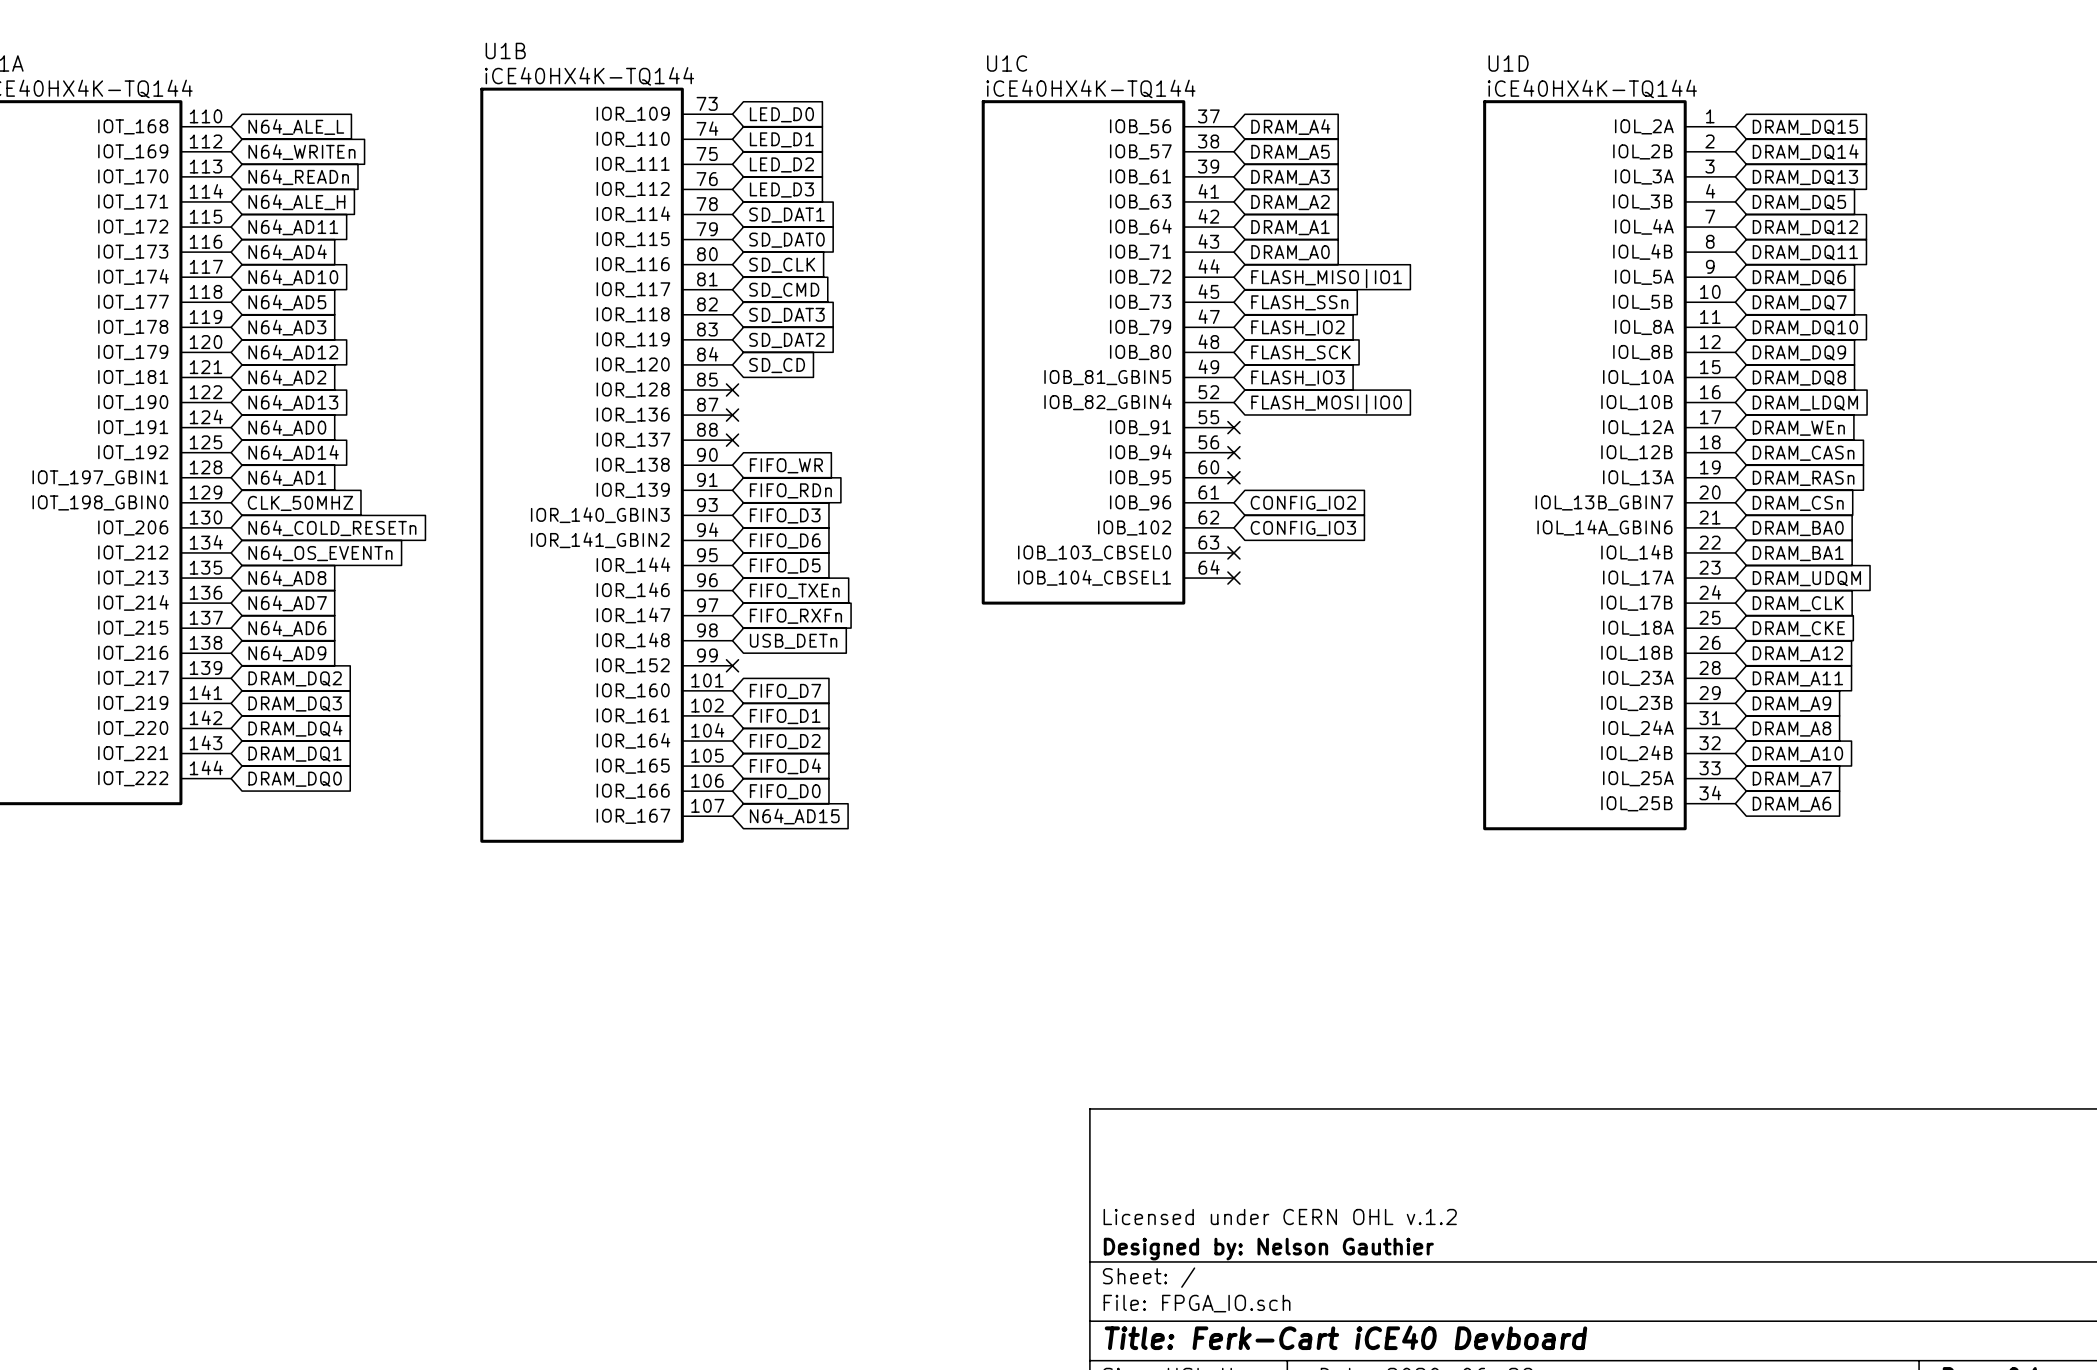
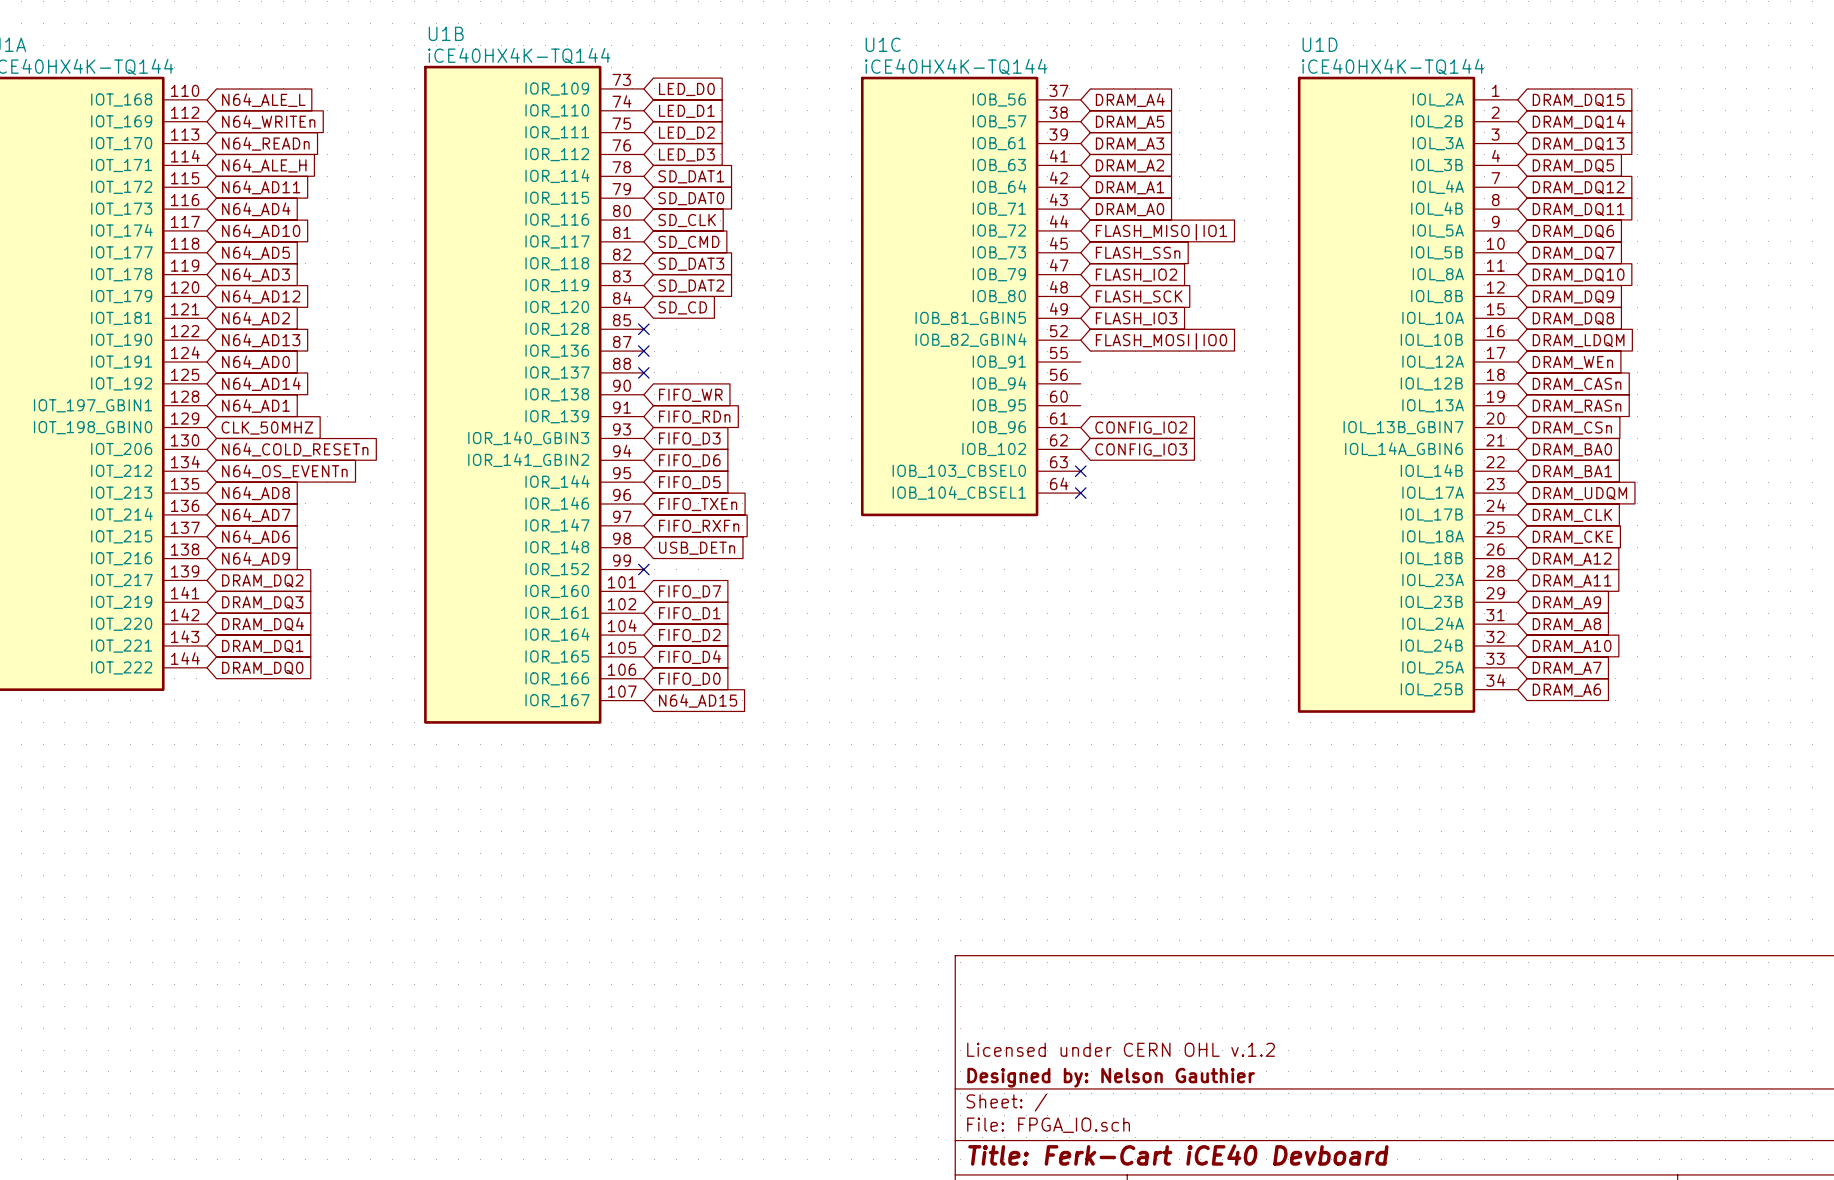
no-connect mark: (1233, 427) -> none
no-connect mark: (1233, 452) -> none
no-connect mark: (1233, 477) -> none

